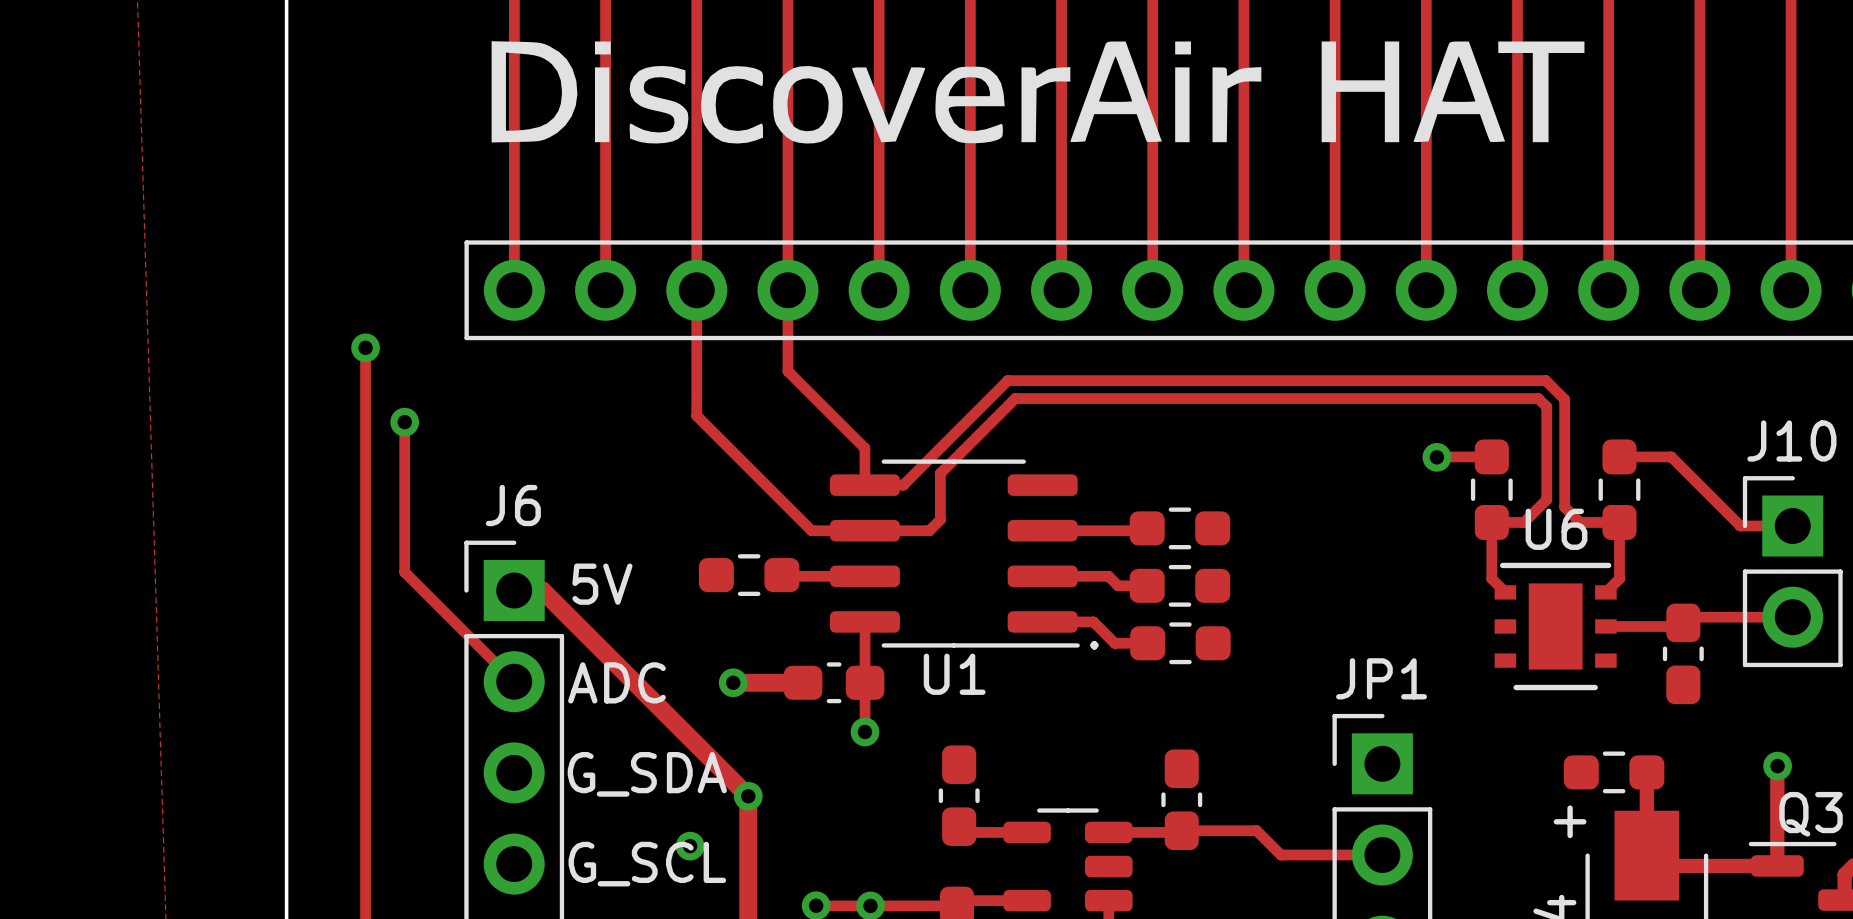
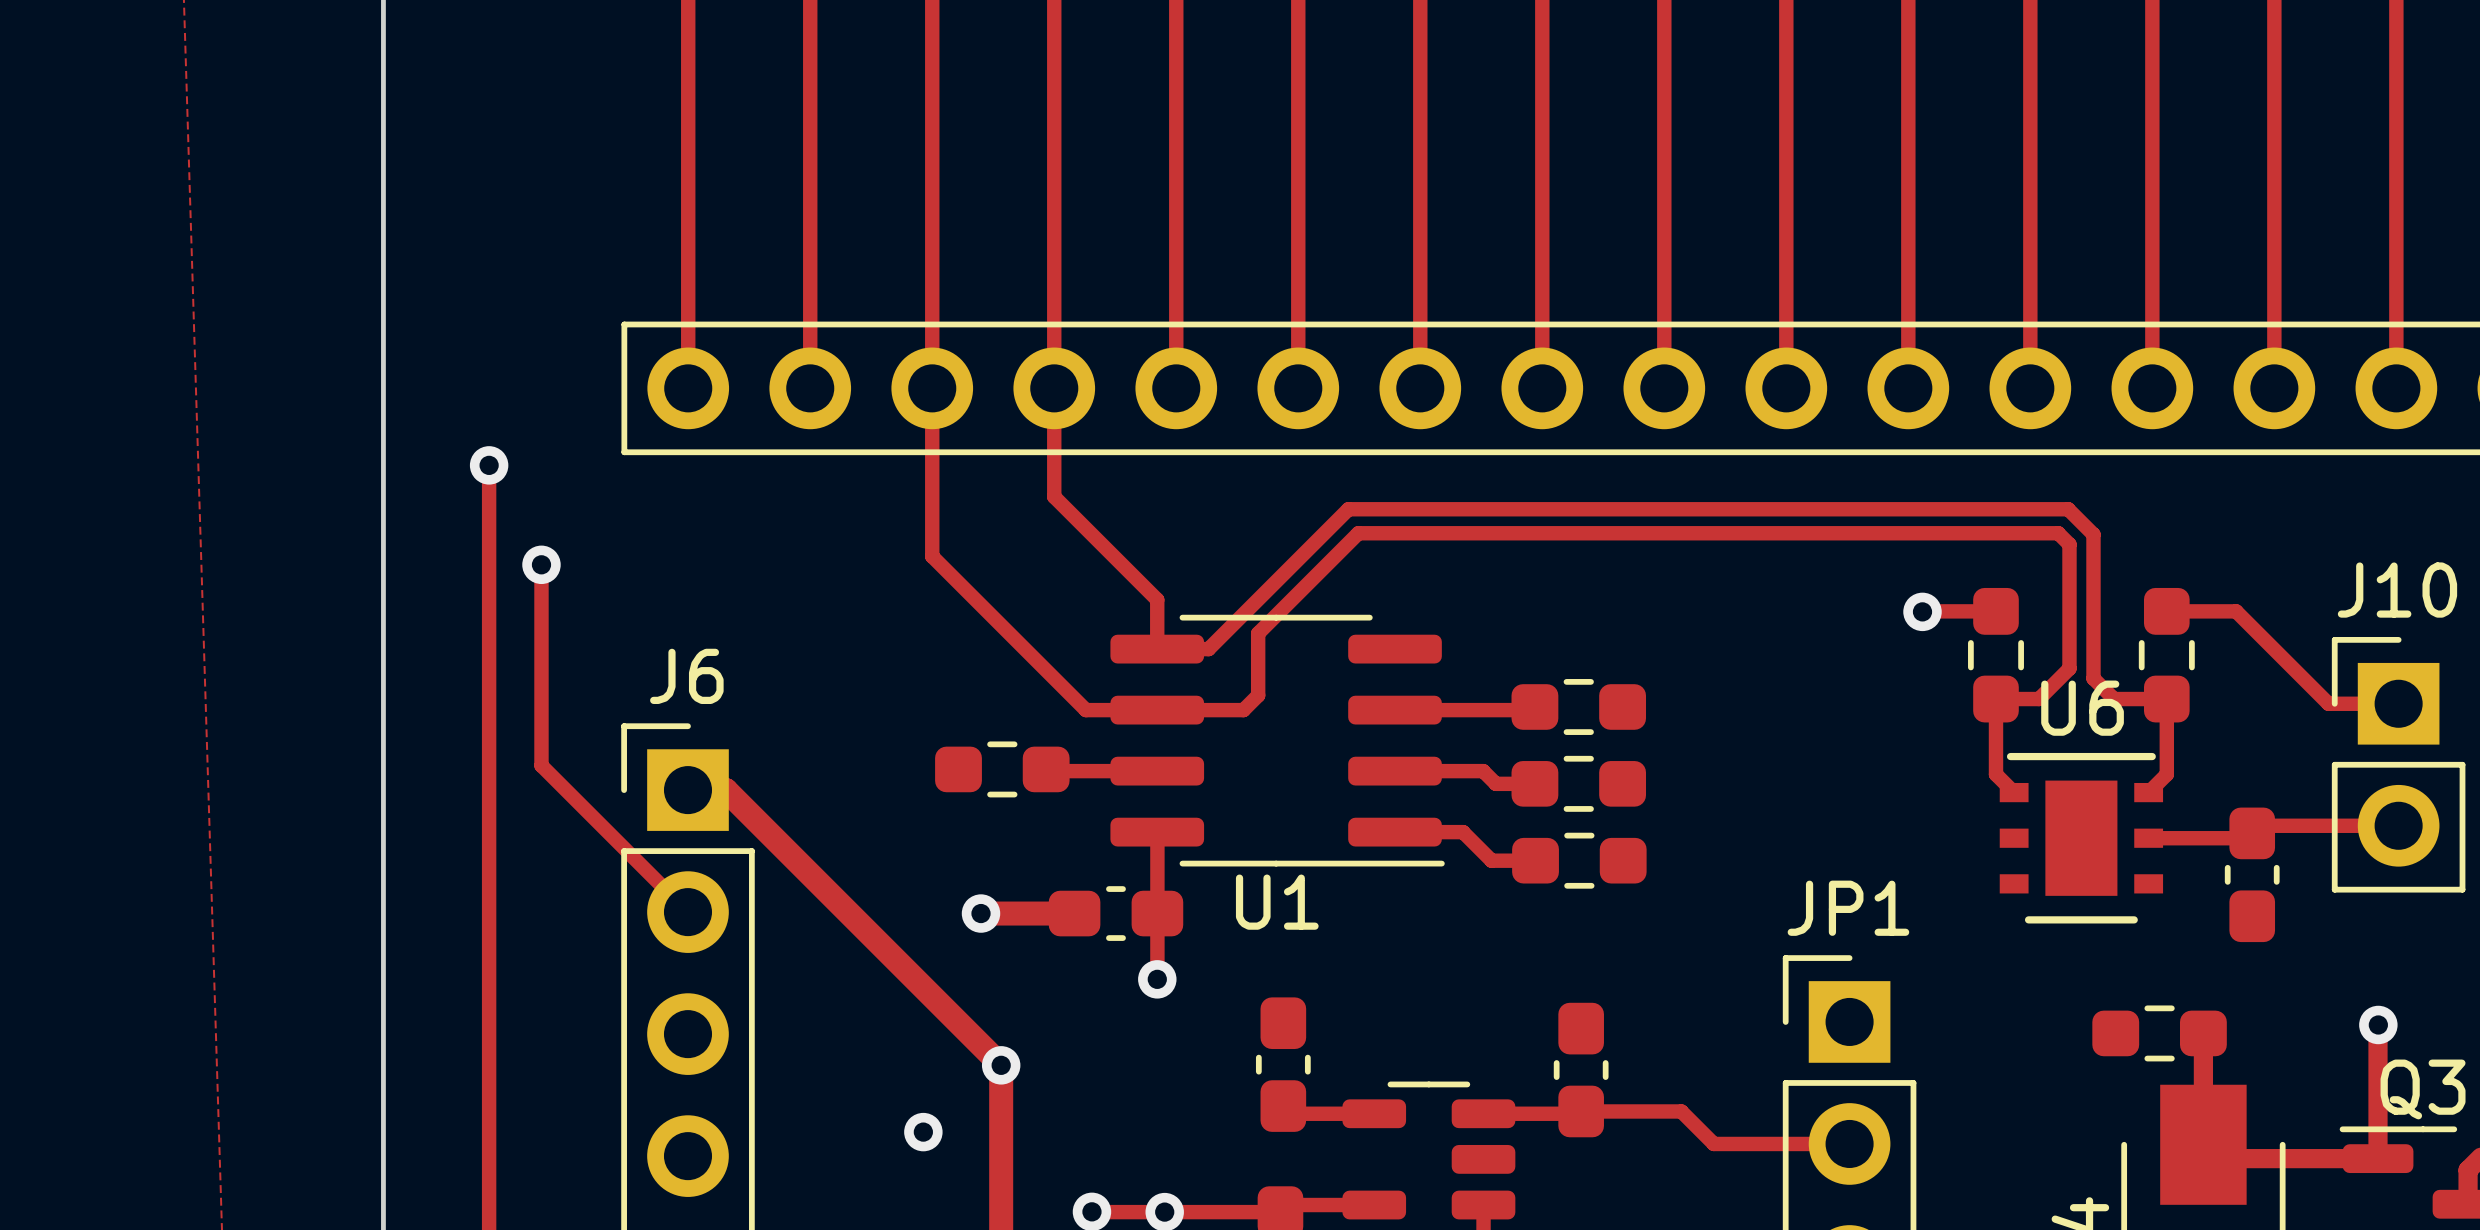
drawing: [491, 41, 1585, 144] -> none
text: 5V (602, 584) -> none
text: . (1094, 645) -> none
text: ADC (616, 682) -> none
text: G_SDA (647, 774) -> none
text: + (1570, 821) -> none
text: G_SCL (647, 864) -> none

